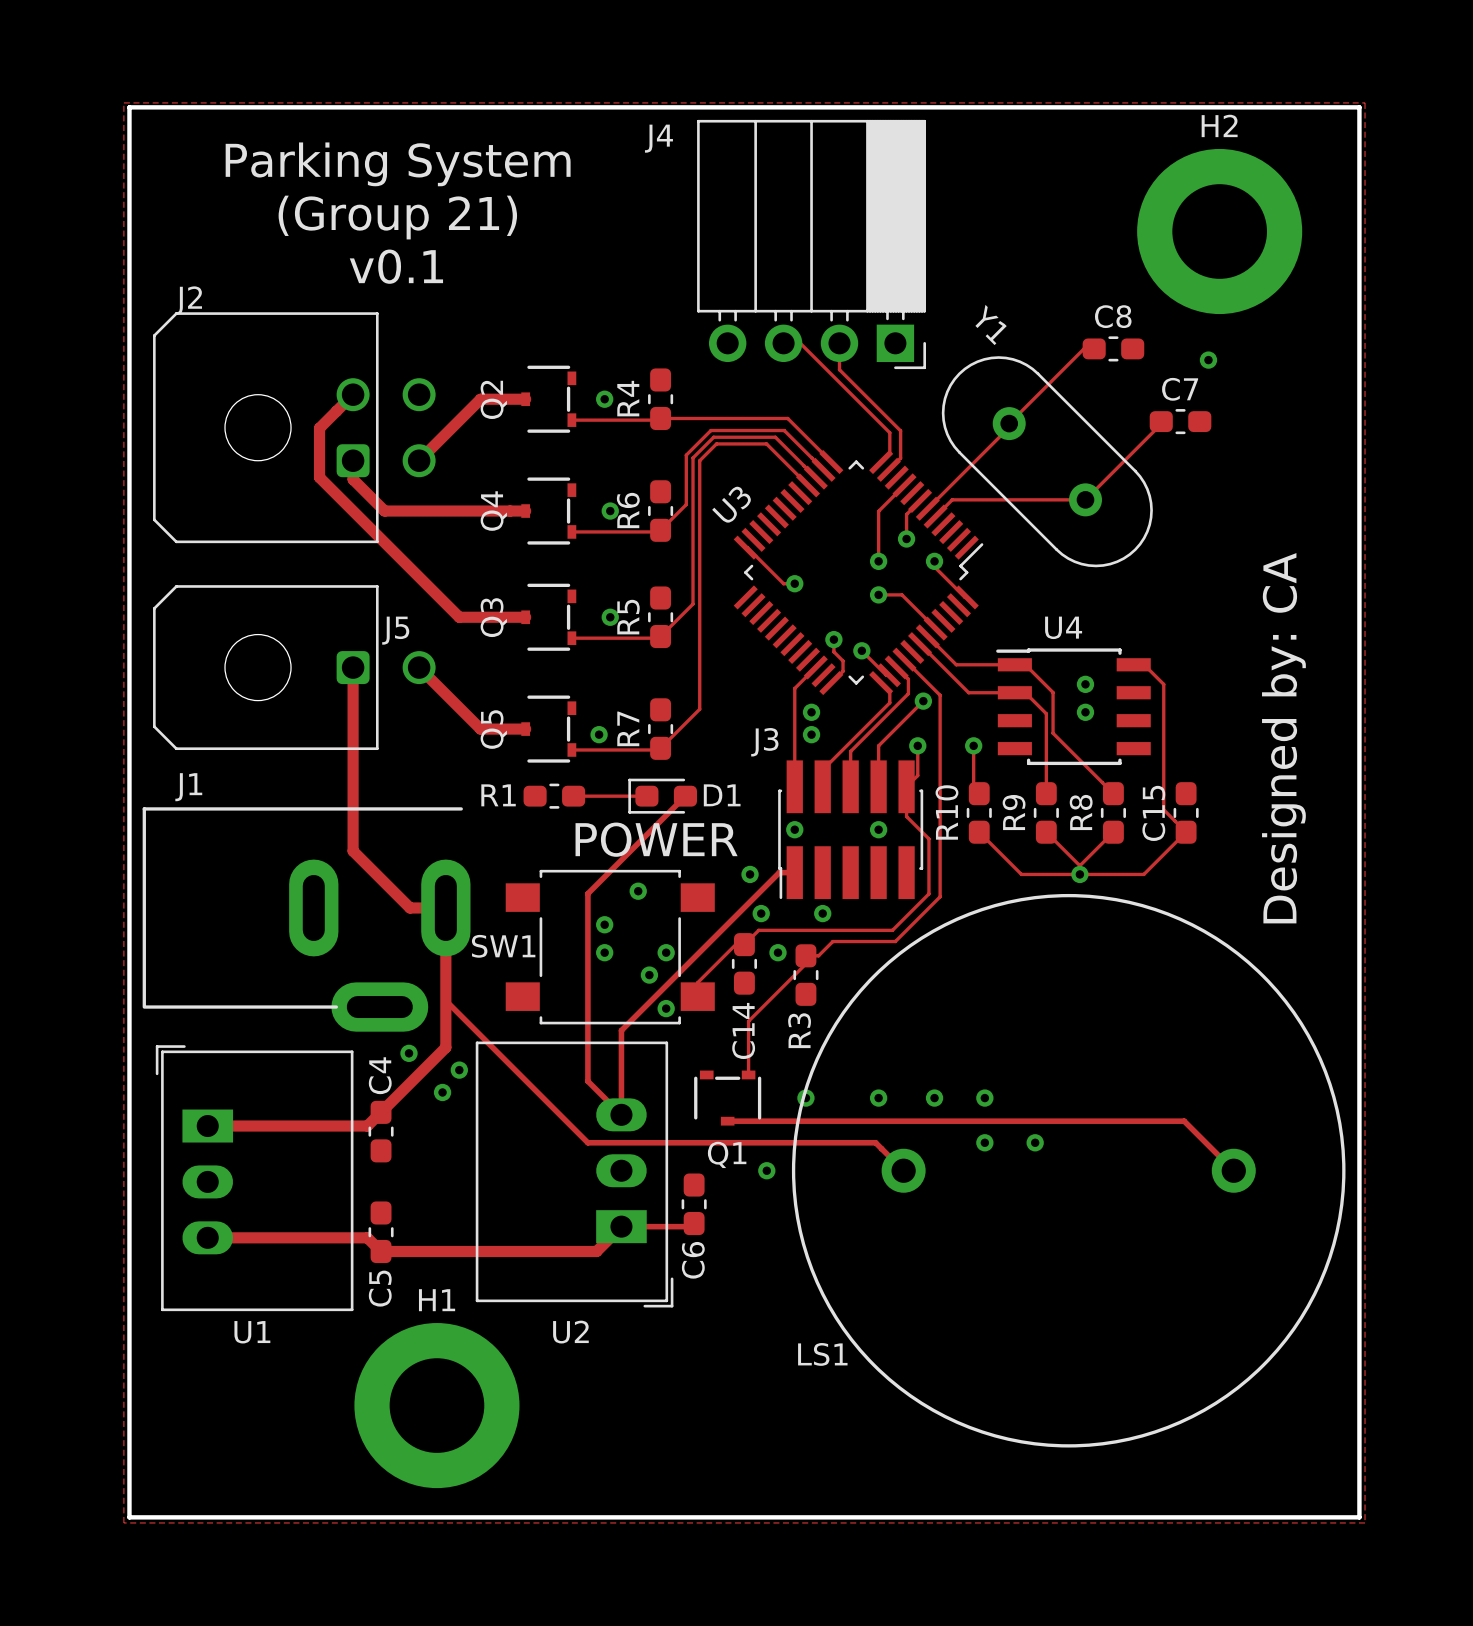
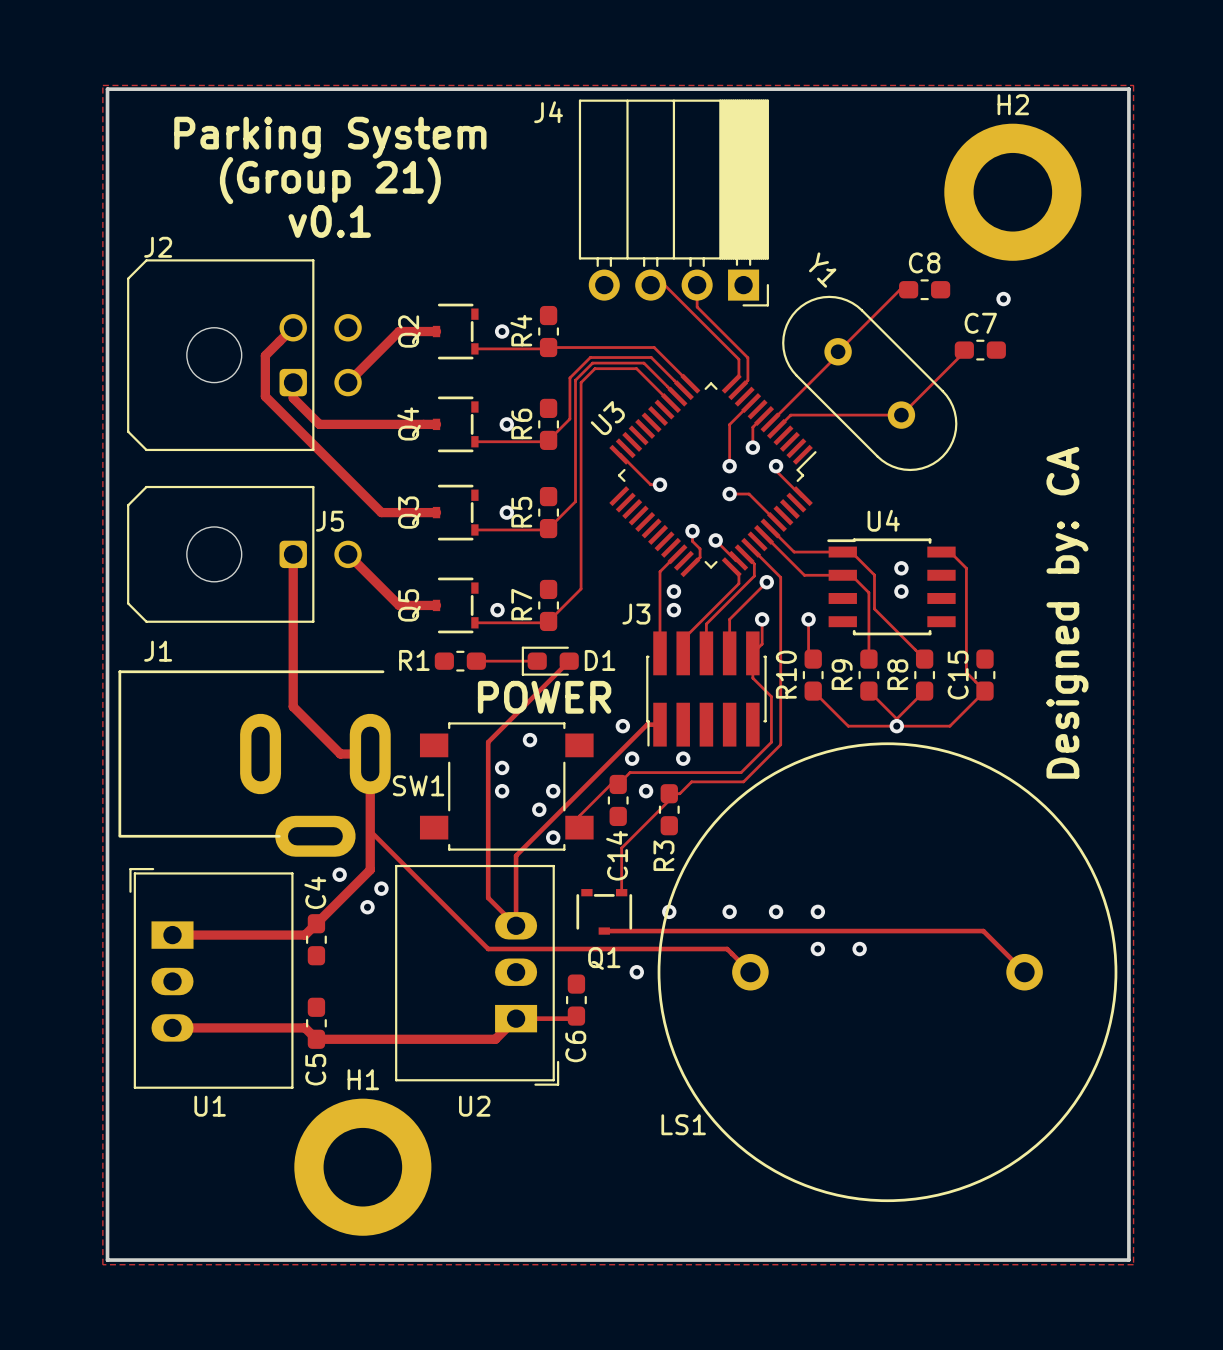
via: (794, 829) -> none
via: (878, 829) -> none

